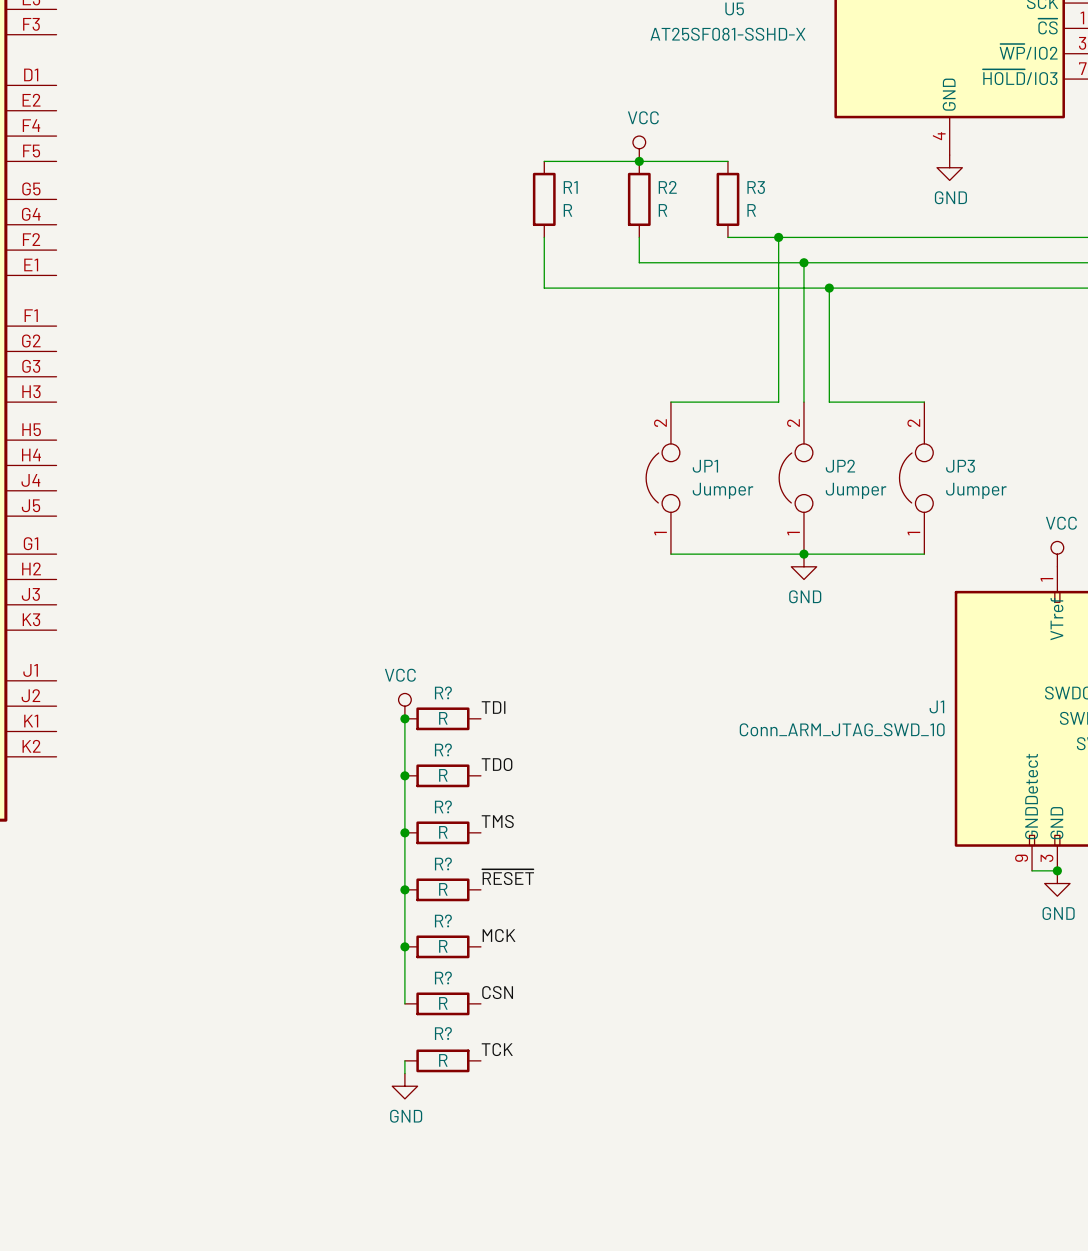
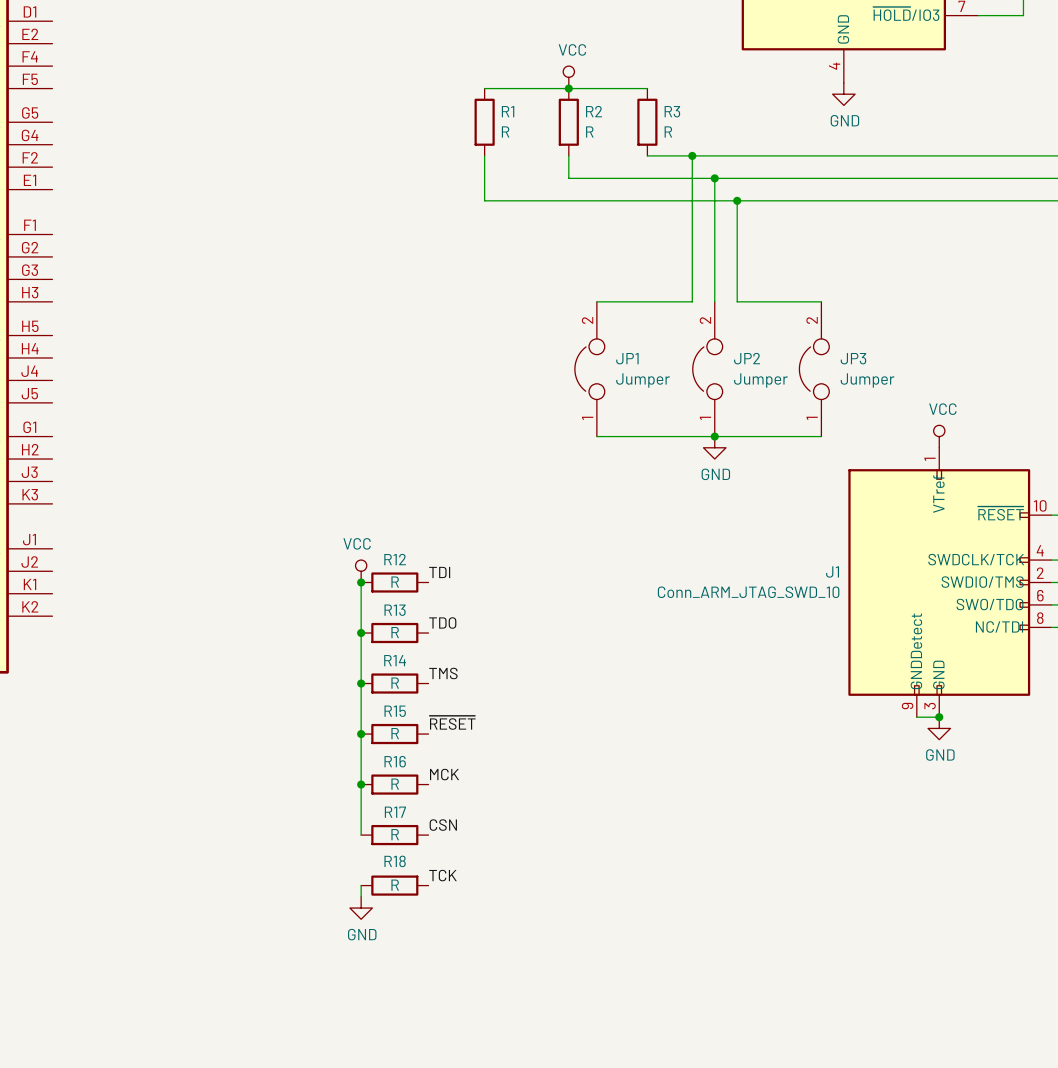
R? name: R? (443, 692) -> R12 (395, 559)
R? name: R? (443, 749) -> R13 (395, 610)
R? name: R? (443, 806) -> R14 (395, 660)
R? name: R? (443, 863) -> R15 (395, 711)
R? name: R? (443, 920) -> R16 (395, 761)
R? name: R? (443, 977) -> R17 (395, 812)
R? name: R? (443, 1033) -> R18 (395, 861)

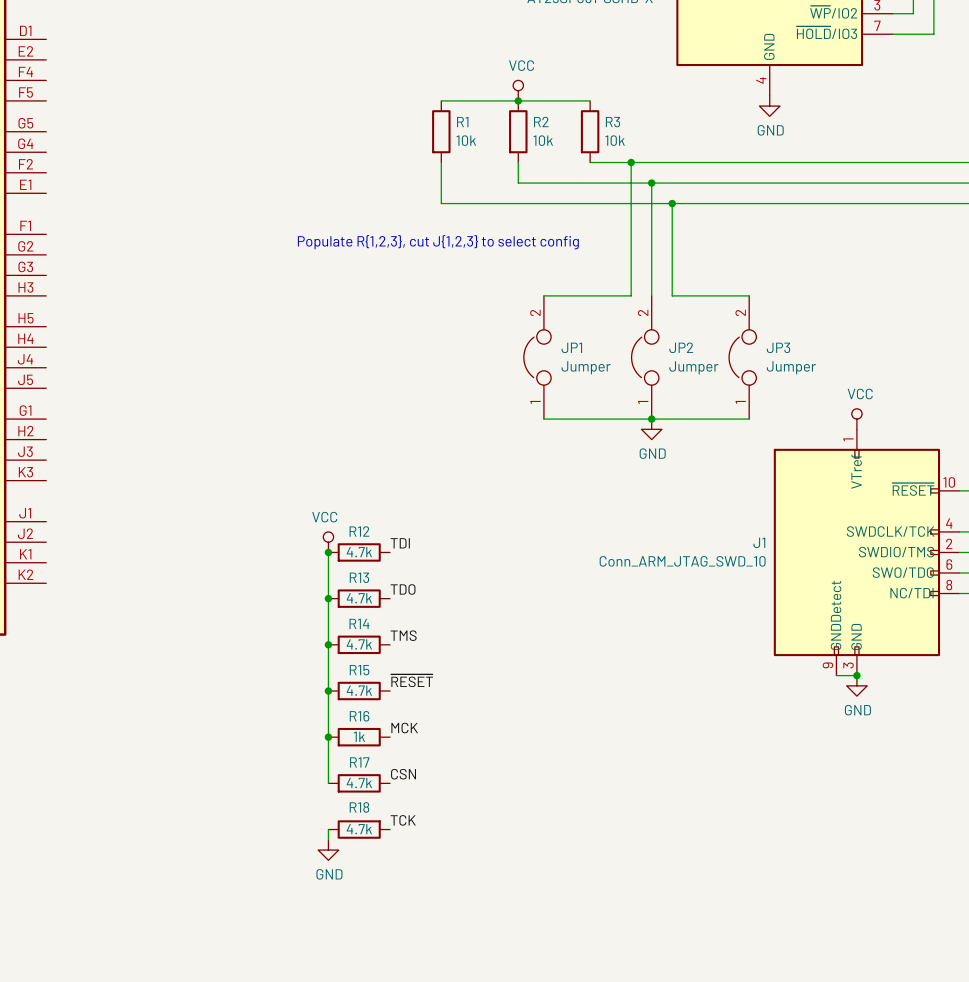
R1 value: R (505, 131) -> 10k (466, 140)
R2 value: R (589, 131) -> 10k (543, 140)
R3 value: R (668, 131) -> 10k (615, 140)
text: none -> Populate R{1,2,3}, cut J{1,2,3} to select config (438, 242)
R12 value: R (395, 582) -> 4.7k (359, 552)
R13 value: R (395, 632) -> 4.7k (359, 598)
R14 value: R (395, 683) -> 4.7k (359, 644)
R15 value: R (395, 733) -> 4.7k (359, 690)
R16 value: R (395, 784) -> 1k (359, 736)
R17 value: R (395, 834) -> 4.7k (359, 782)
R18 value: R (395, 885) -> 4.7k (359, 829)

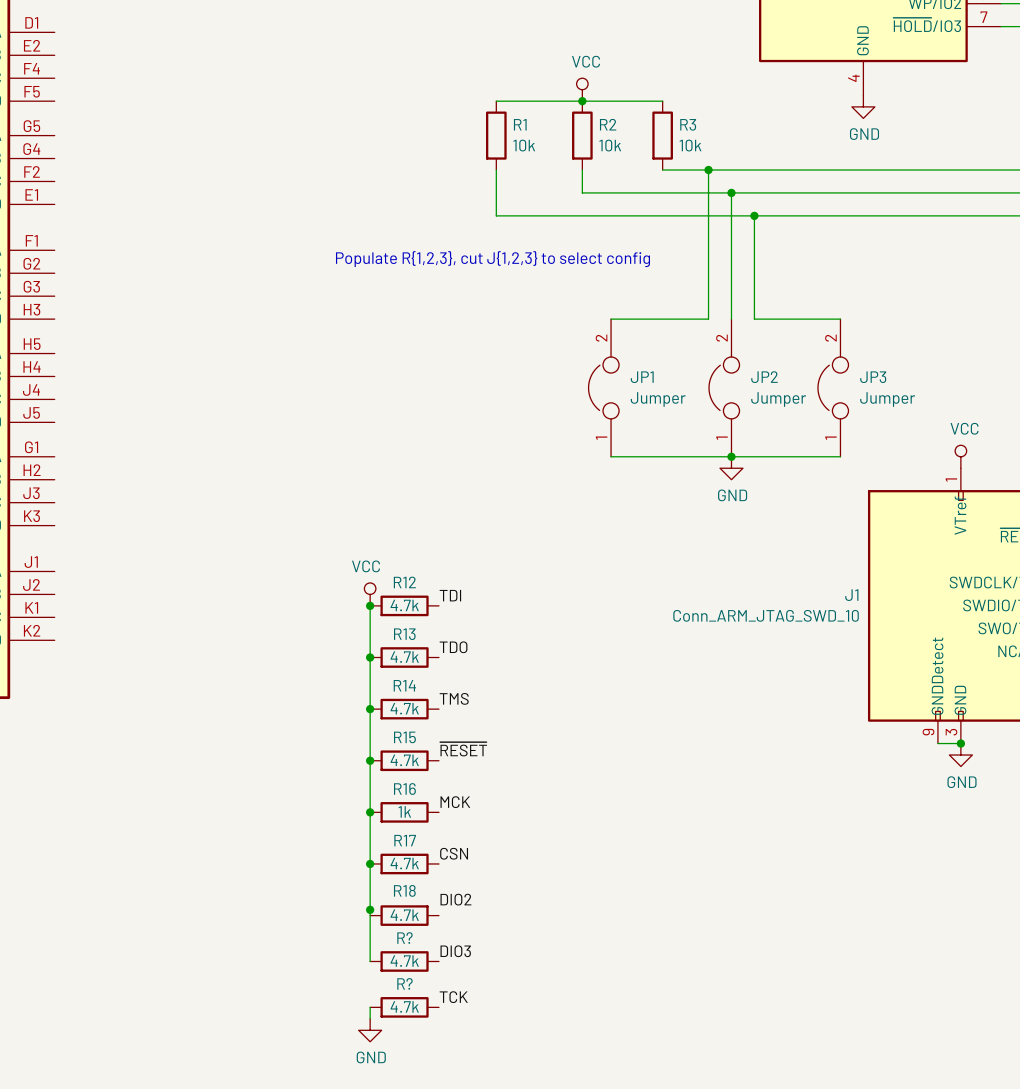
wire: none -> (370, 863) (370, 915)
junction: none -> (370, 863)
label: TCK (403, 820) -> DIO2 (455, 899)
junction: none -> (370, 909)
wire: none -> (370, 927) (370, 961)
power symbol position: GND (328, 850) -> GND (370, 1030)
label: none -> DIO3 (455, 951)
R?: none -> 4.7k (404, 961)
label: none -> TCK (453, 997)
wire: none -> (370, 1007) (370, 1018)
R?: none -> 4.7k (404, 1007)

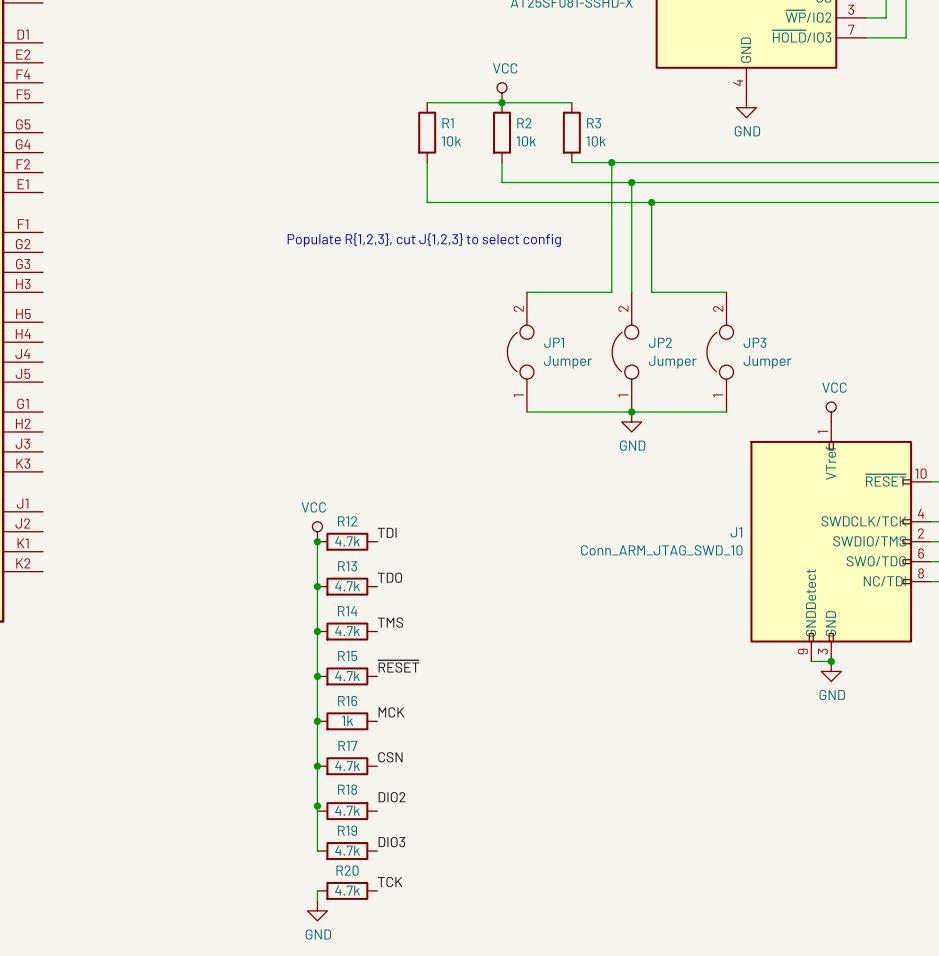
R? name: R? (404, 938) -> R19 (347, 830)
R? name: R? (404, 983) -> R20 (347, 870)

